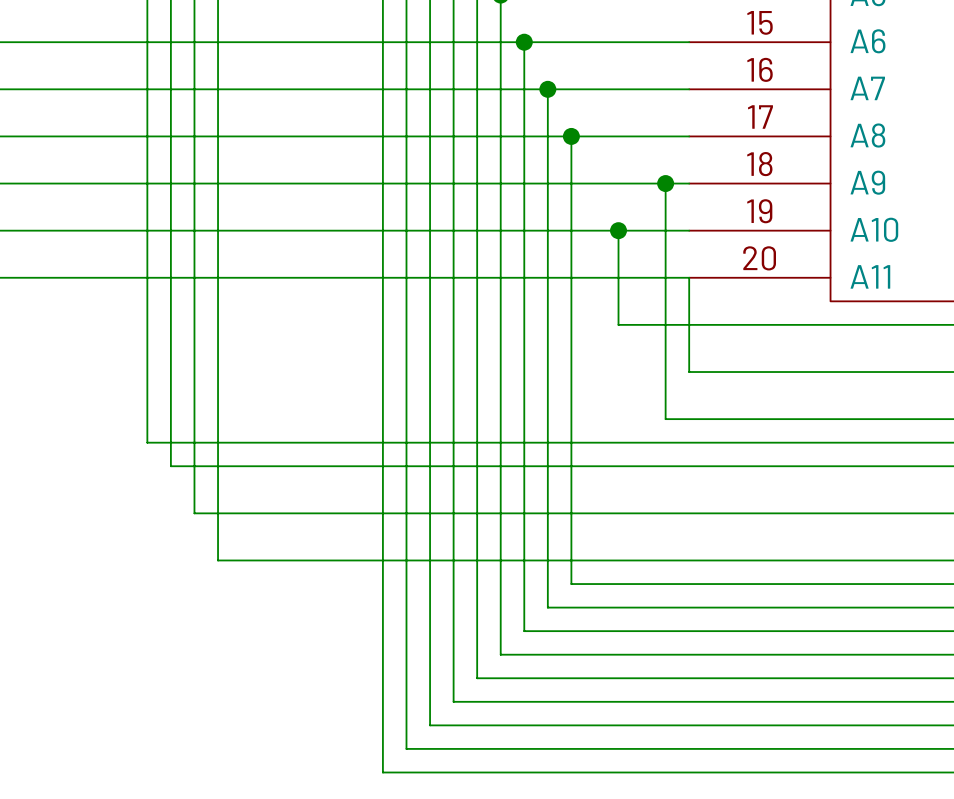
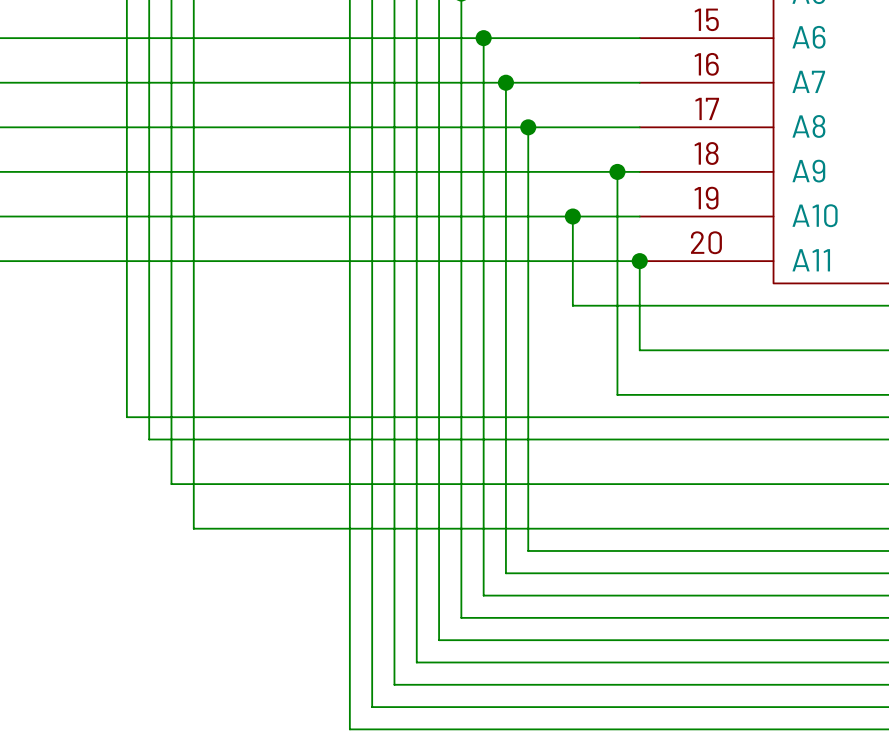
junction: none -> (639, 261)

